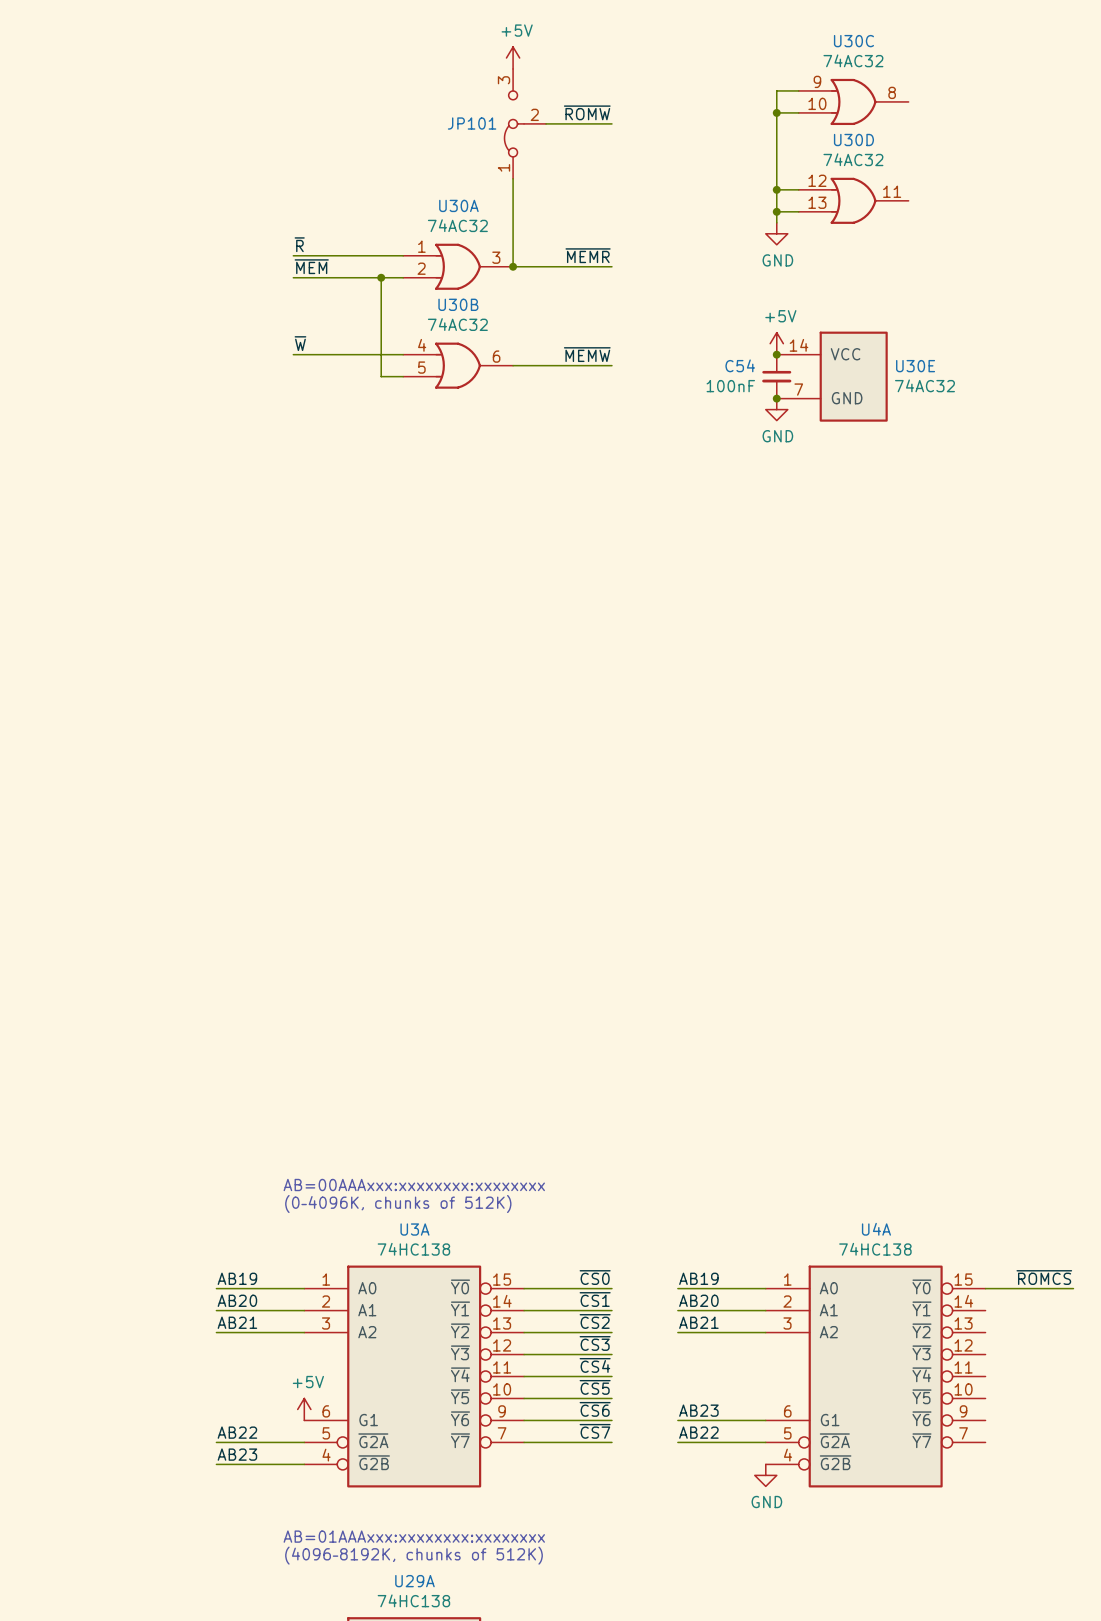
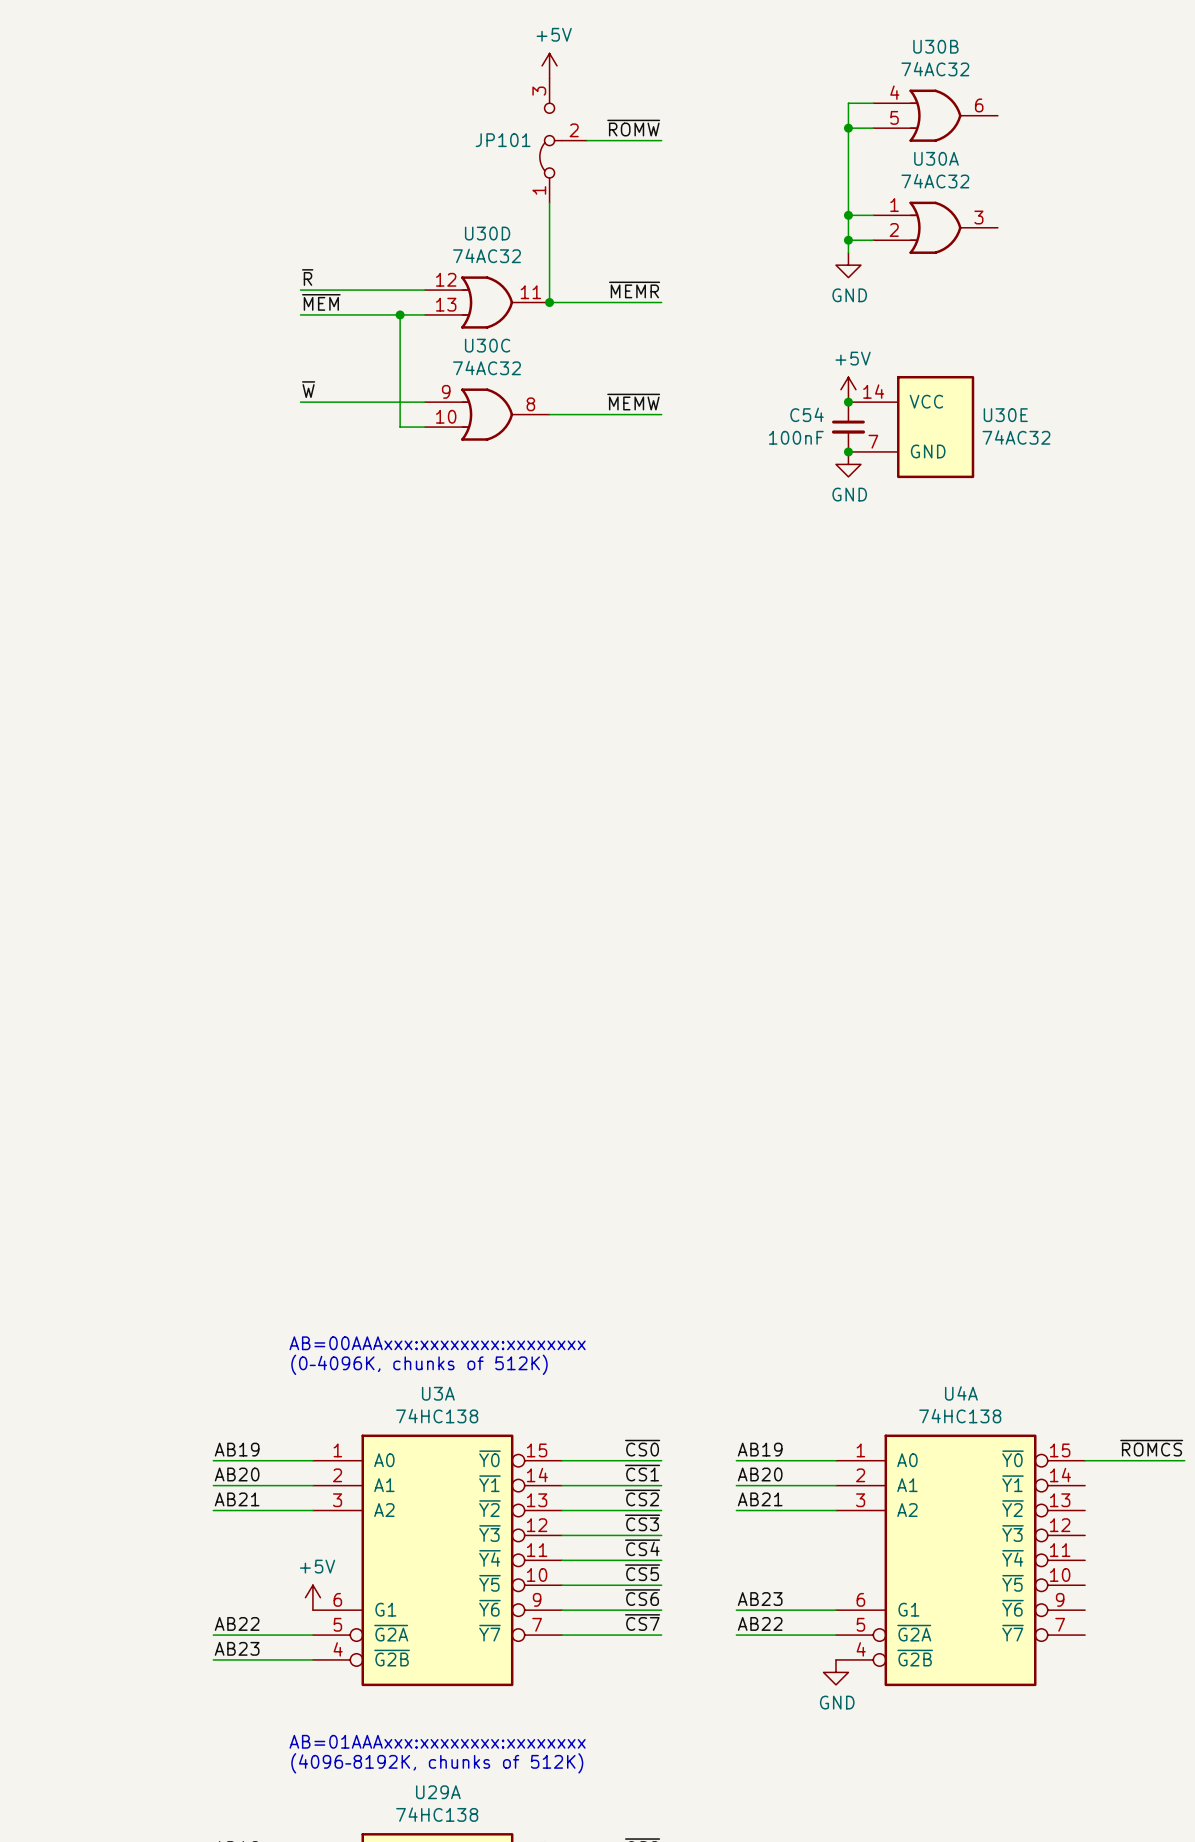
U30C position: (853, 101) -> (487, 414)
U30D position: (853, 200) -> (487, 302)
U30A position: (458, 266) -> (935, 227)
U30B position: (458, 365) -> (935, 115)

